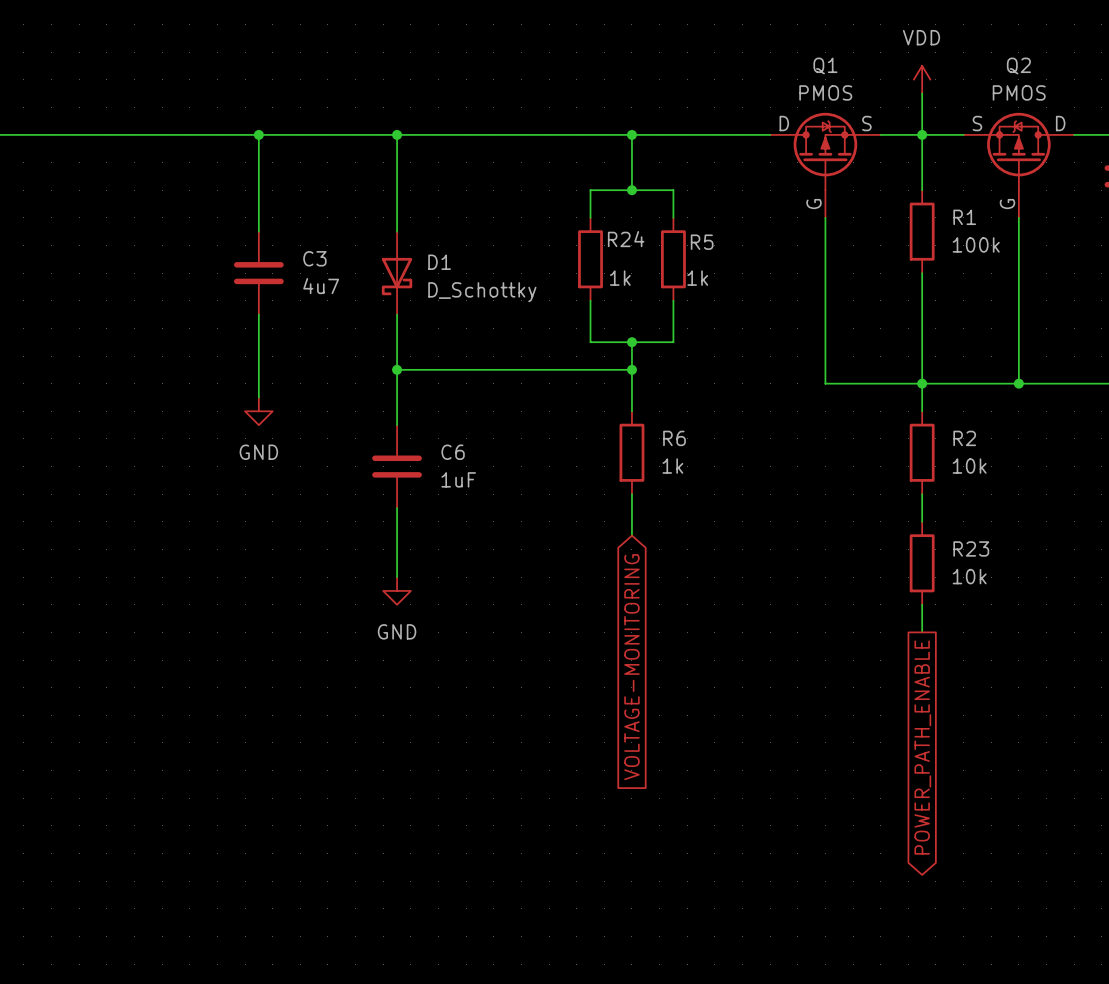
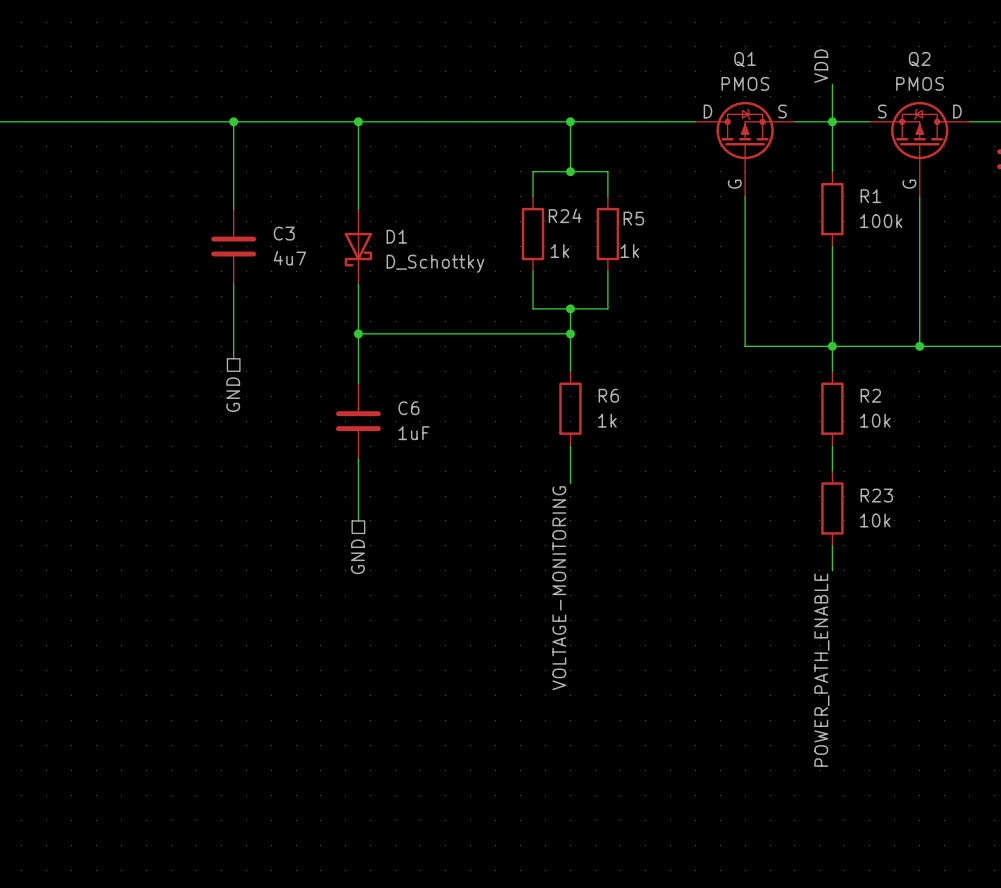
label: none -> VDD (821, 66)
power symbol: VDD (922, 79) -> none
power symbol: GND (258, 411) -> none
hierarchical label: none -> GND (233, 394)
power symbol: GND (397, 590) -> none
hierarchical label: none -> GND (357, 556)
label: none -> VOLTAGE-MONITORING (559, 588)
global label: VOLTAGE-MONITORING (631, 667) -> none
label: none -> POWER_PATH_ENABLE (821, 670)
global label: POWER_PATH_ENABLE (922, 747) -> none

